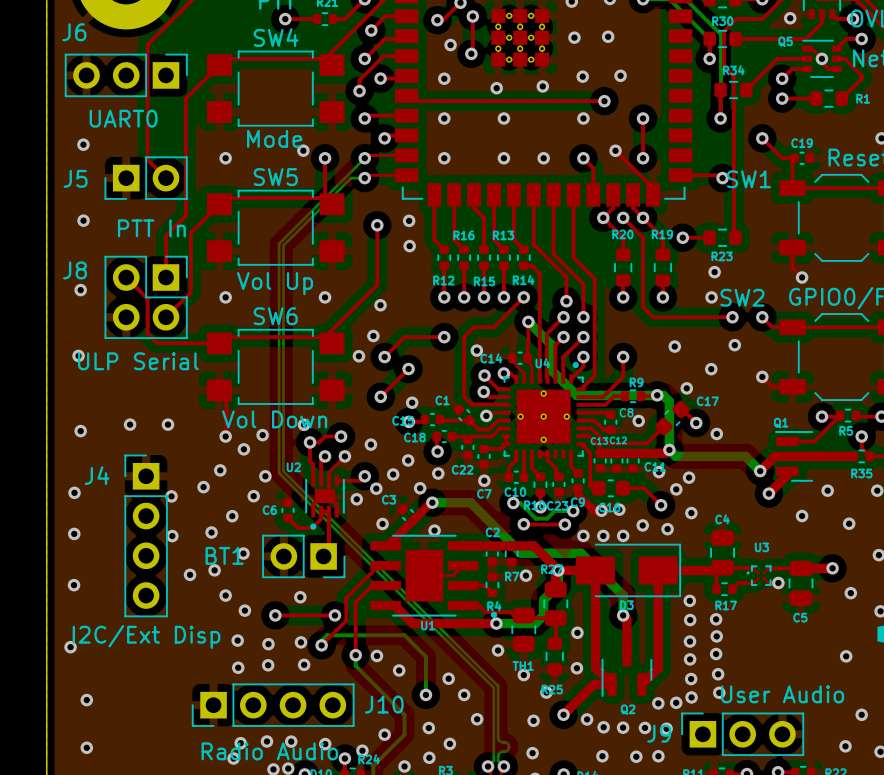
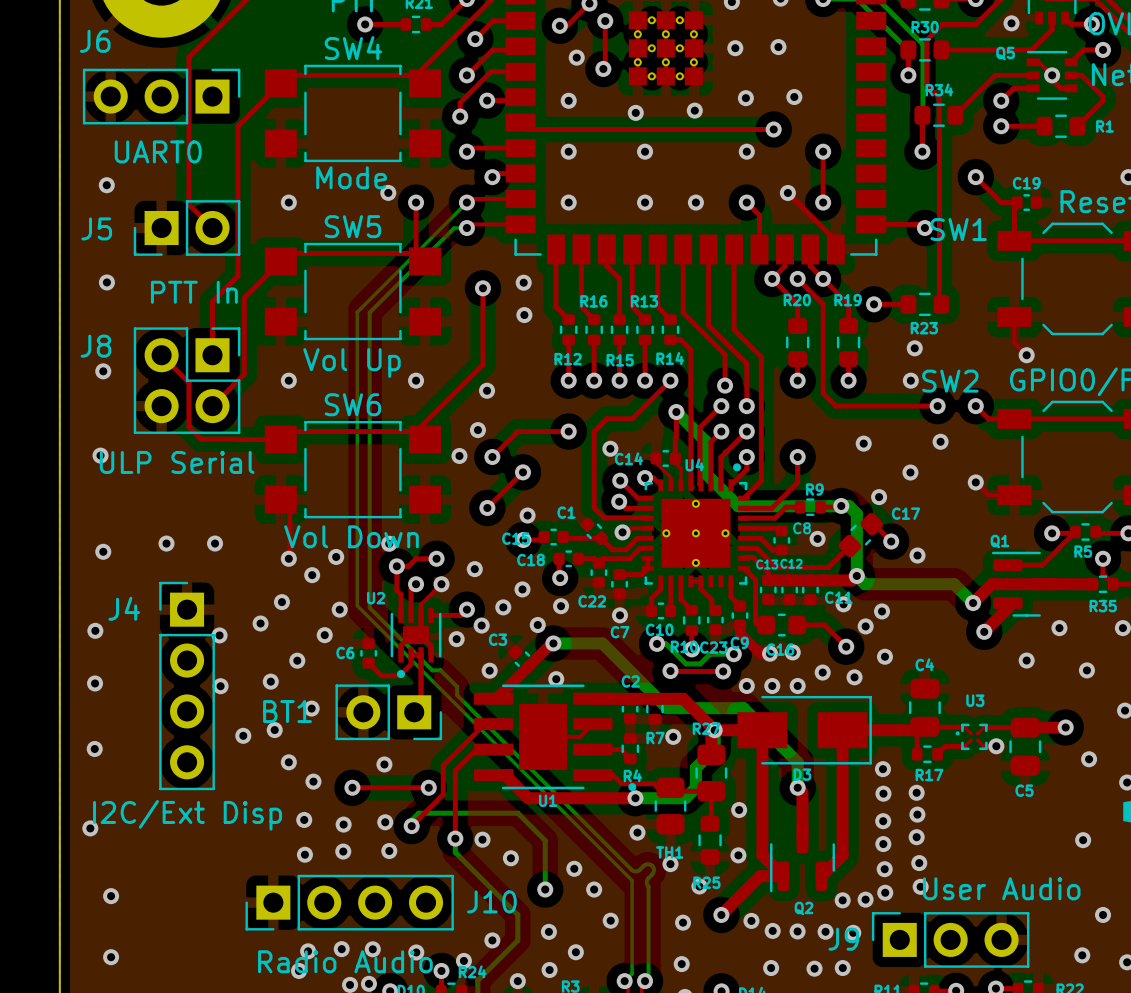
bottom track: (354, 178) (351, 178) (283, 245) (283, 471) (498, 686) (498, 738) (508, 746) (507, 750) (500, 752) (498, 755) (498, 760) (503, 766) -> (454, 228) (369, 312) (369, 607) (432, 670) (440, 670) (457, 686) (457, 695) (631, 869) (637, 871) (646, 864) (652, 865) (653, 872) (648, 878)
bottom track: none -> (648, 878) (646, 882) (648, 886) (648, 977) (645, 981)

